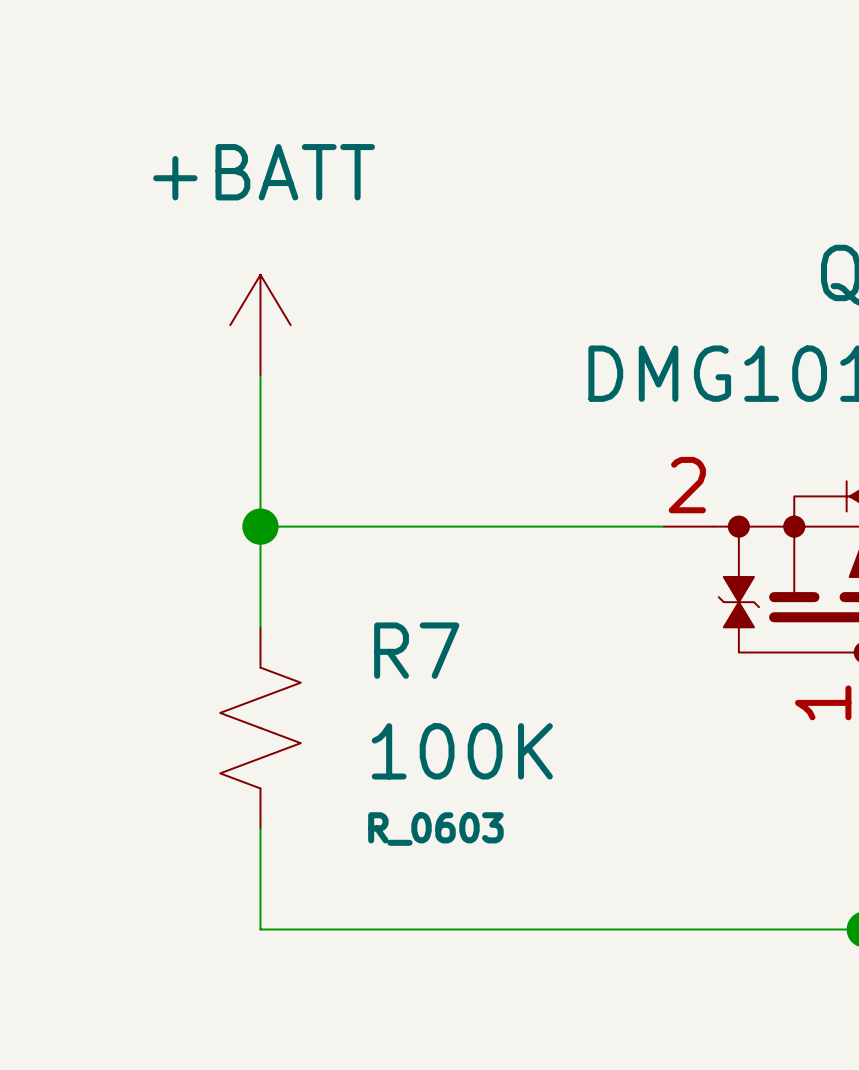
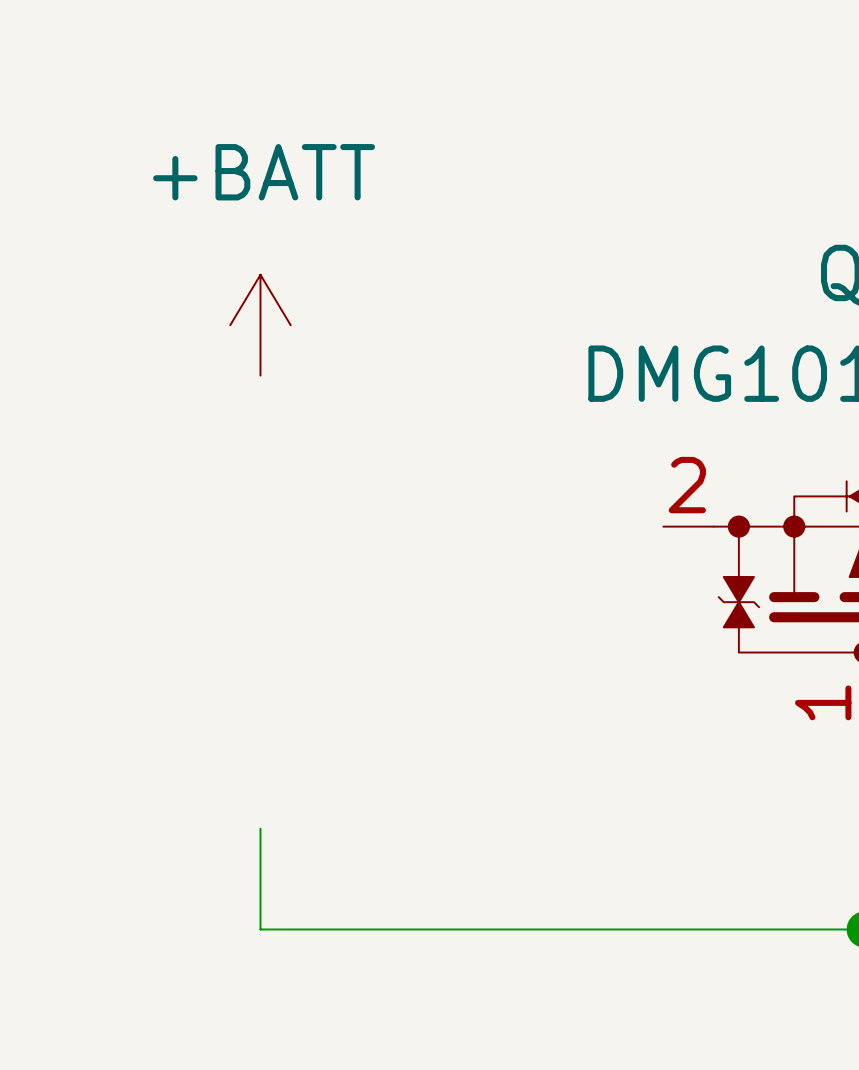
wire: (260, 375) (260, 627) -> none
wire: (260, 526) (663, 526) -> none
junction: (260, 526) -> none
R7: 100K (260, 728) -> none

